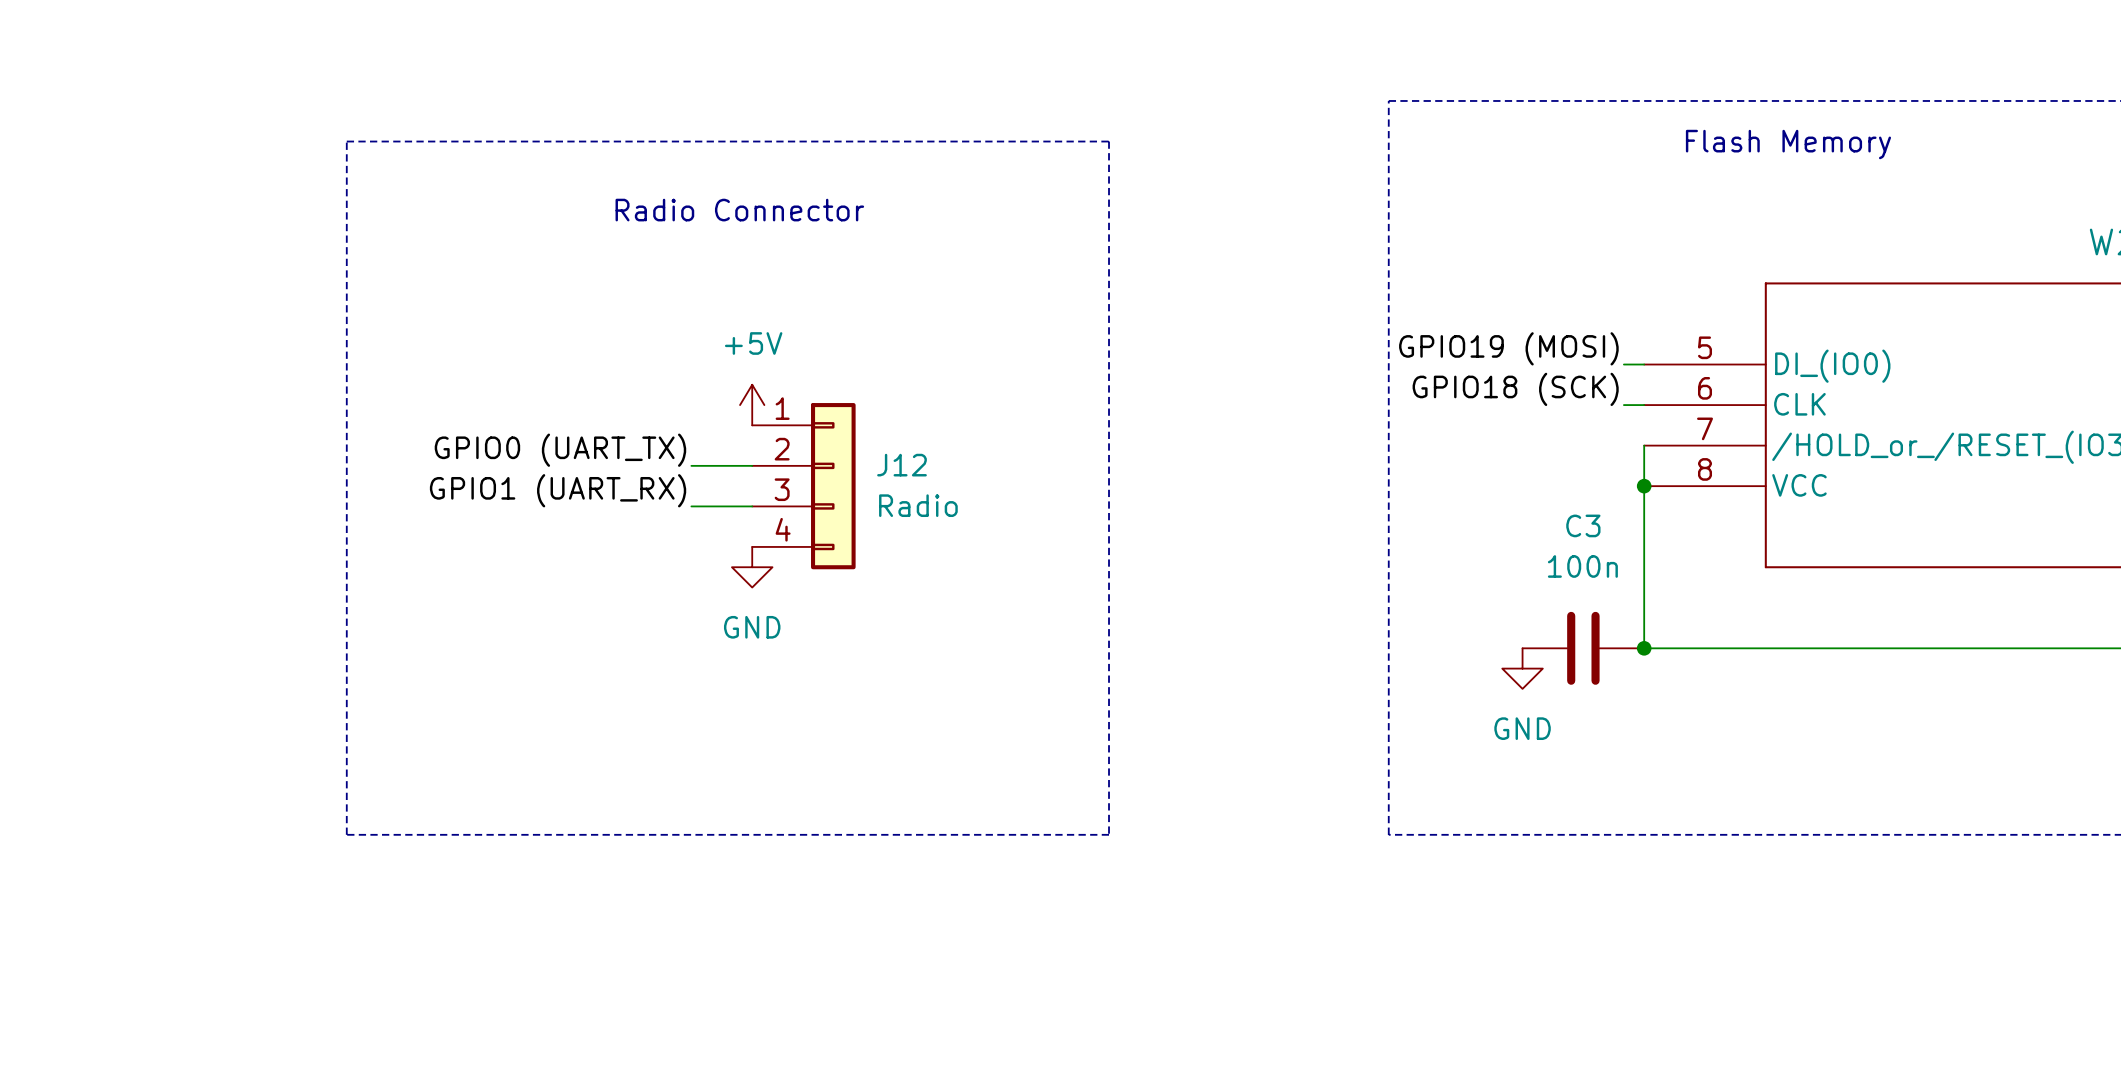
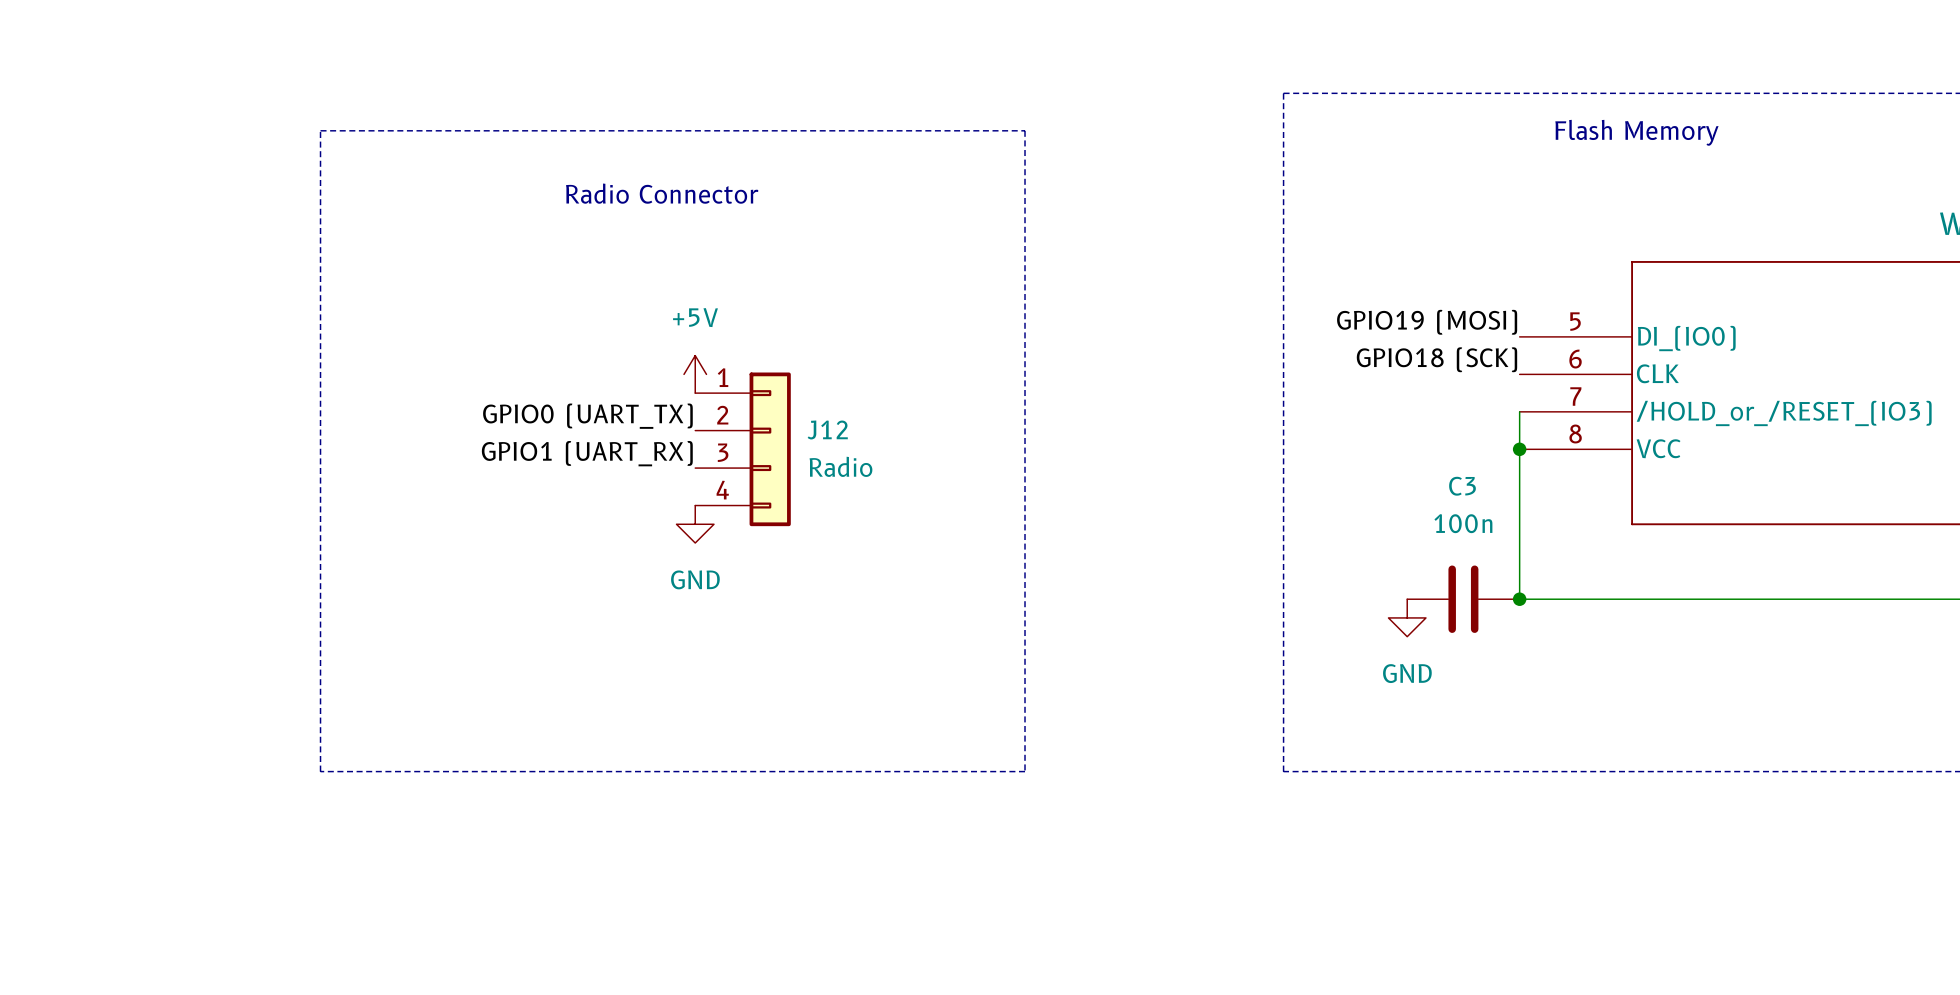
label position: GPIO19 (MOSI) (1508, 348) -> GPIO19 (MOSI) (1427, 322)
wire: (1623, 364) (1644, 364) -> none
label position: GPIO18 (SCK) (1515, 389) -> GPIO18 (SCK) (1436, 359)
wire: (1623, 405) (1644, 405) -> none
label position: GPIO0 (UART_TX) (560, 450) -> GPIO0 (UART_TX) (587, 416)
wire: (691, 465) (752, 465) -> none
label position: GPIO1 (UART_RX) (558, 490) -> GPIO1 (UART_RX) (587, 453)
wire: (691, 506) (752, 506) -> none

